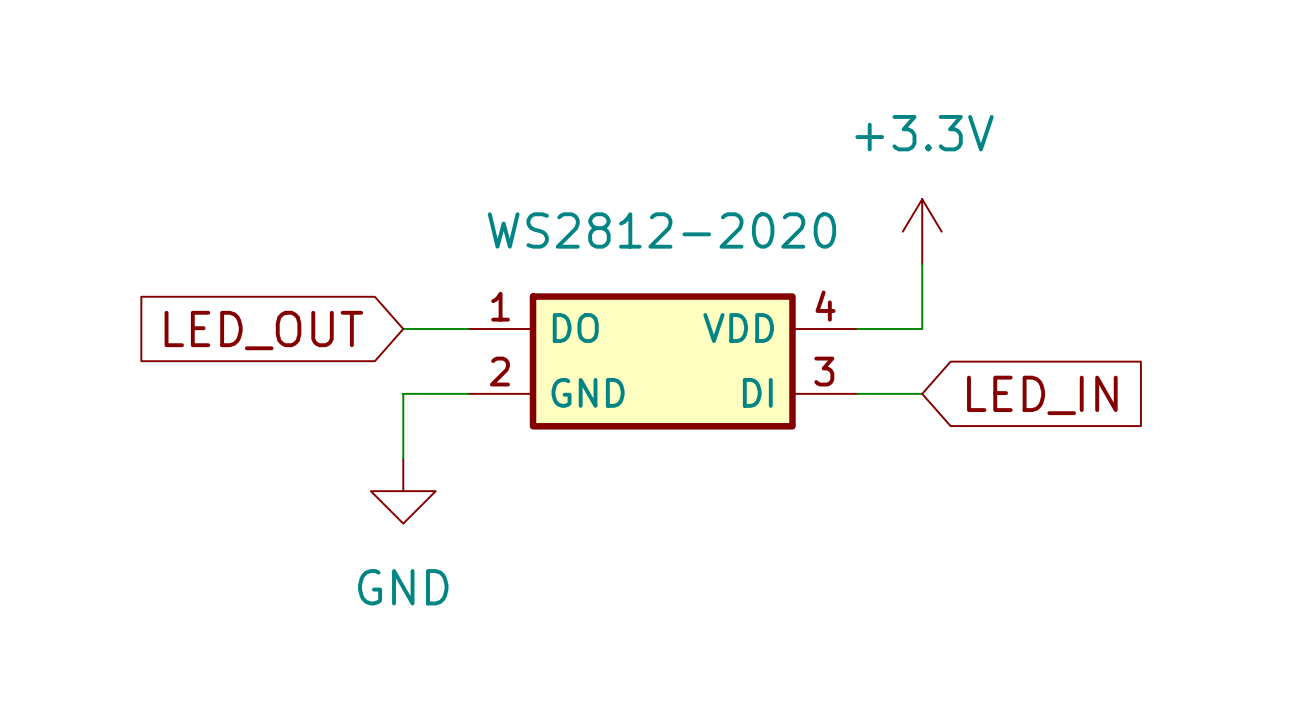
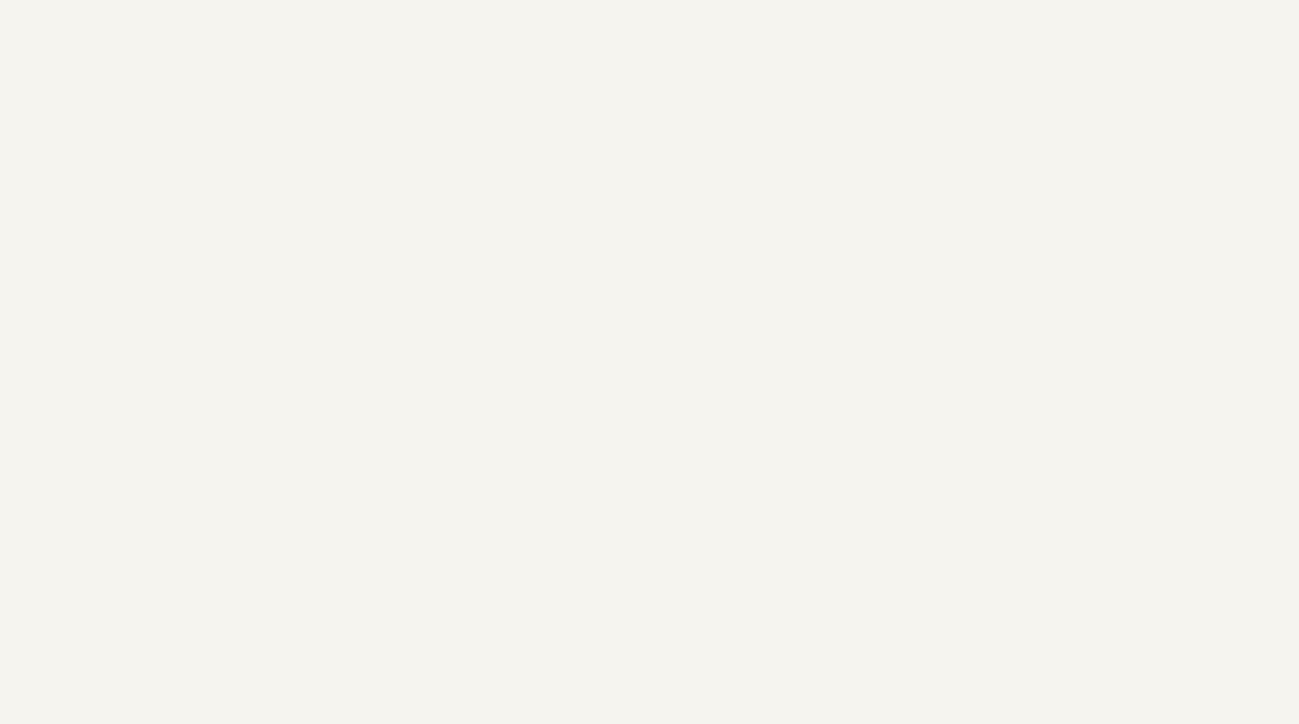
power symbol: +3.3V (922, 231) -> none
wire: (922, 264) (922, 328) (857, 328) -> none
wire: (403, 328) (468, 328) -> none
global label: LED_OUT (263, 330) -> none
part: WS2812-2020 (662, 361) -> none
wire: (468, 393) (403, 393) (403, 458) -> none
wire: (857, 393) (922, 393) -> none
global label: LED_IN (1042, 395) -> none
power symbol: GND (403, 491) -> none

